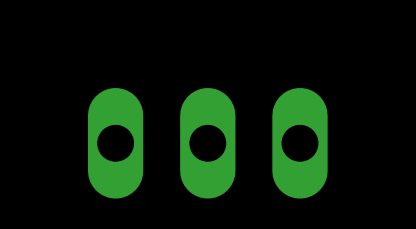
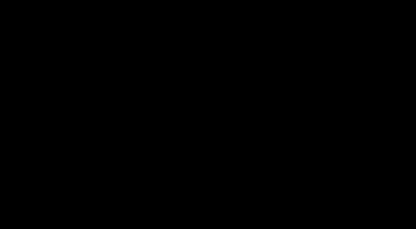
part: (207, 143) -> none

